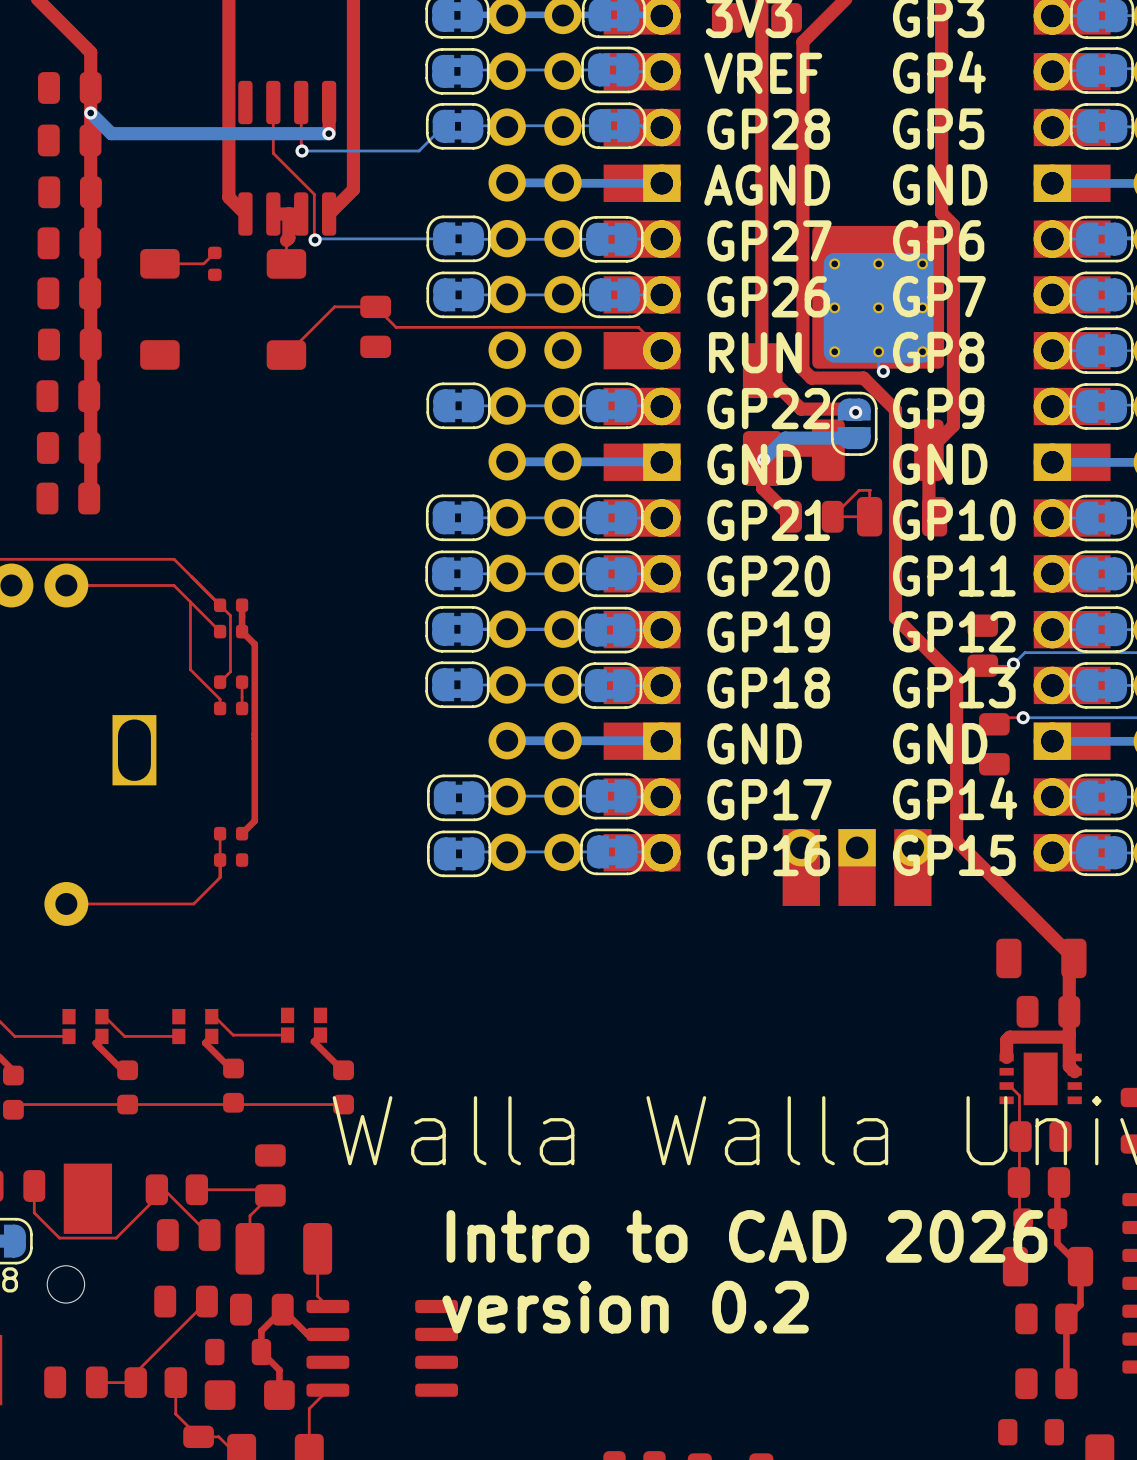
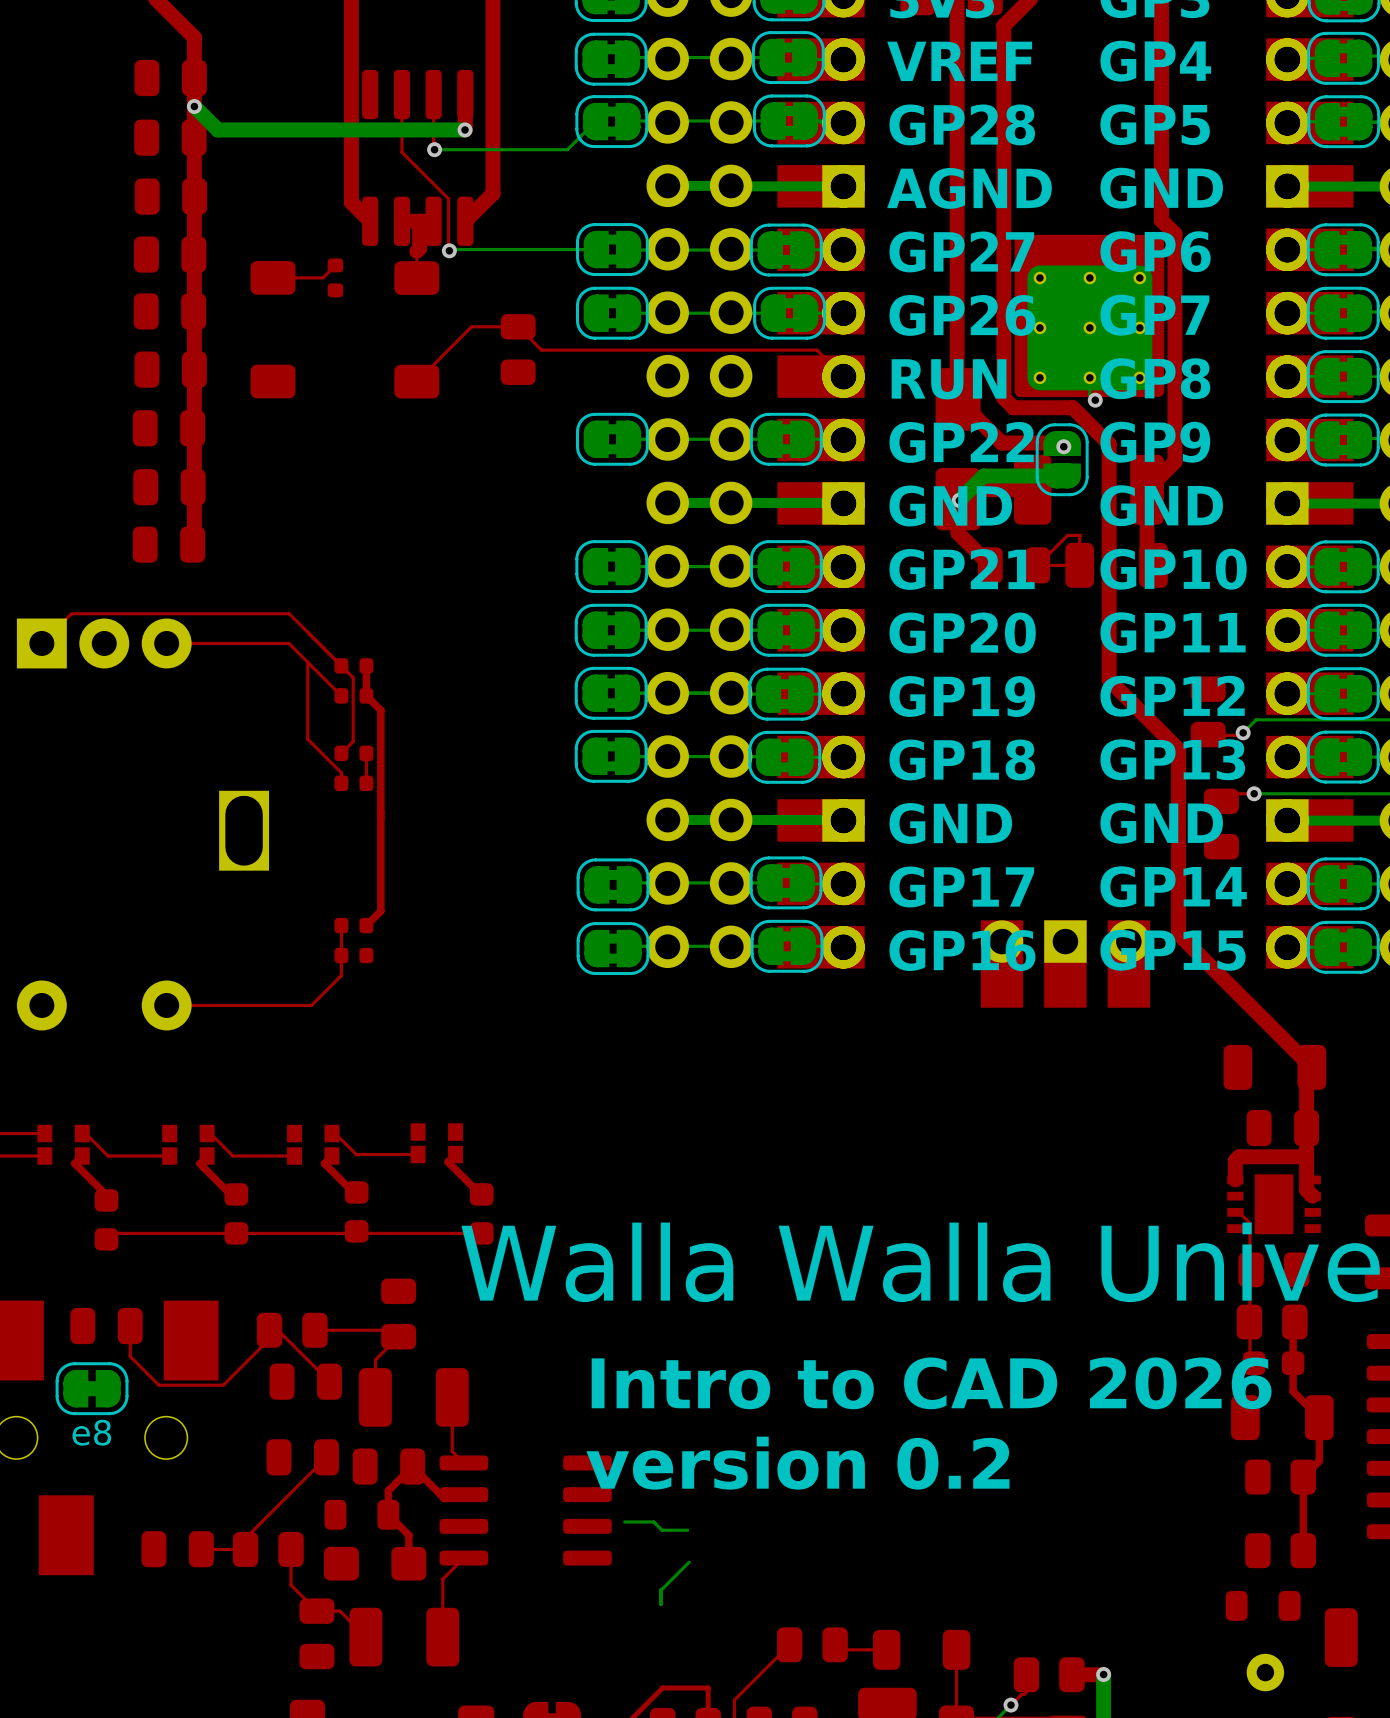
bottom track: none -> (624, 1522) (653, 1522) (661, 1530) (687, 1530)
bottom track: none -> (689, 1562) (661, 1590)
bottom track: none -> (661, 1589) (661, 1604)

